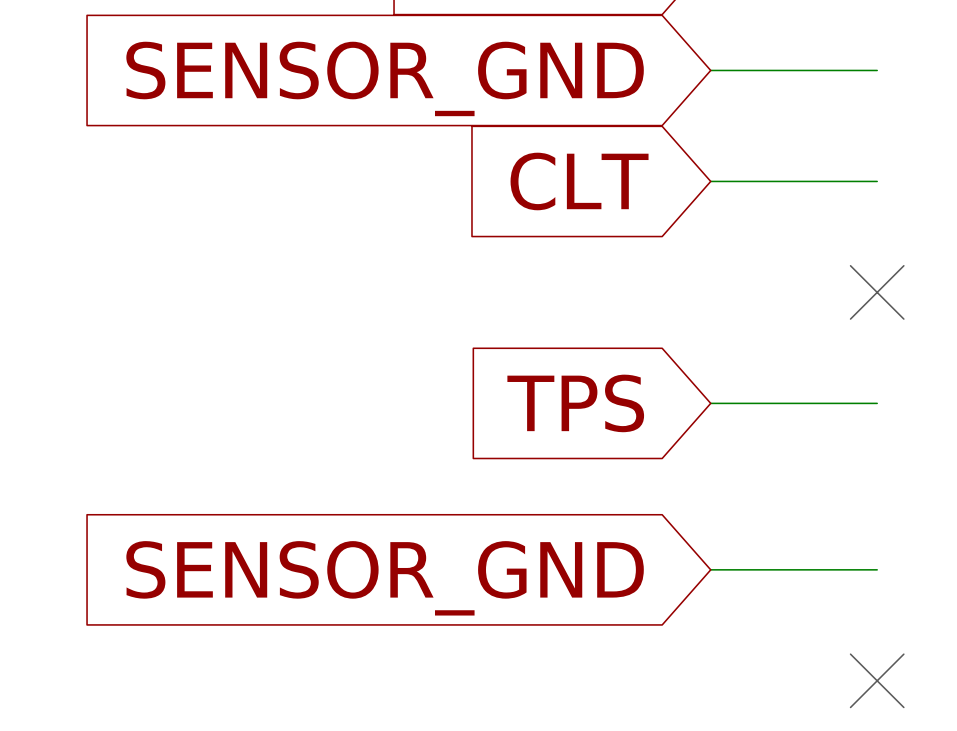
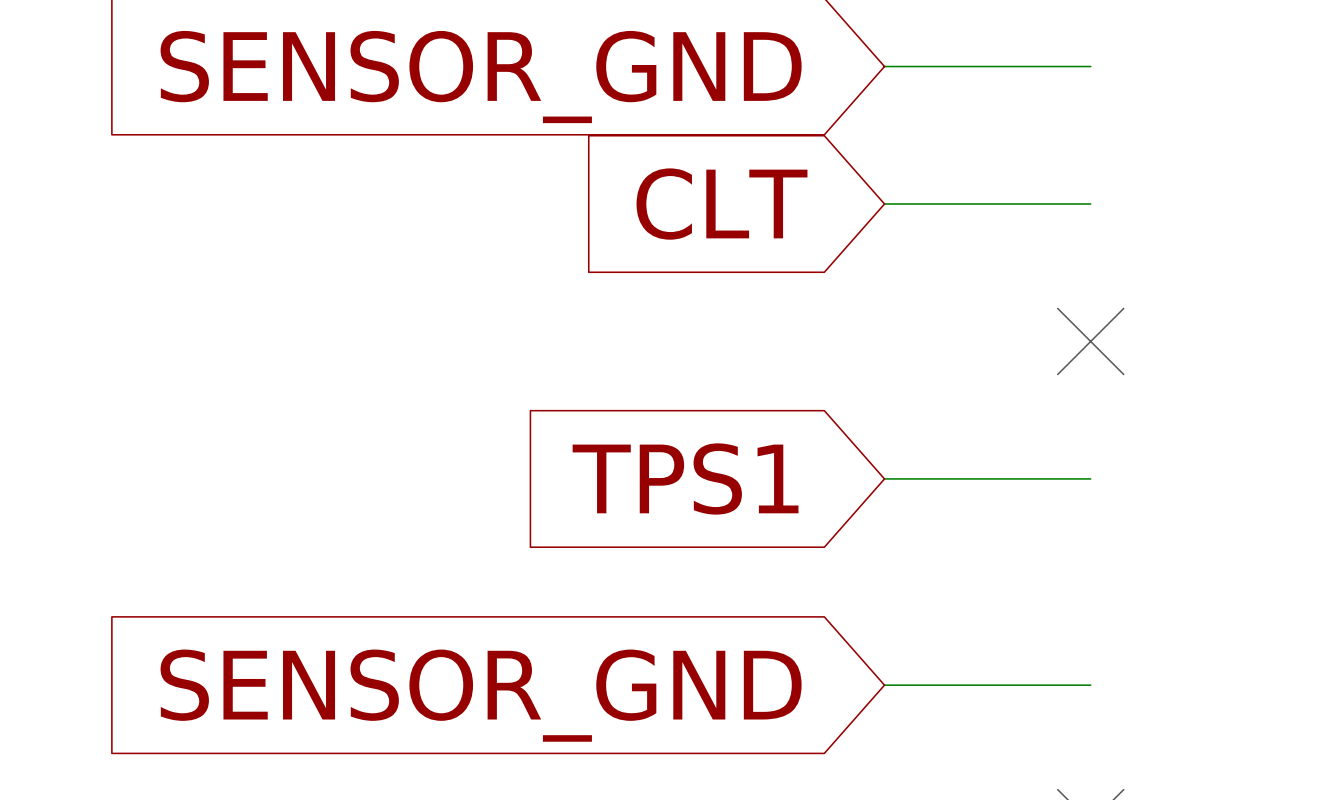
global label: TPS (575, 403) -> TPS1 (685, 478)

